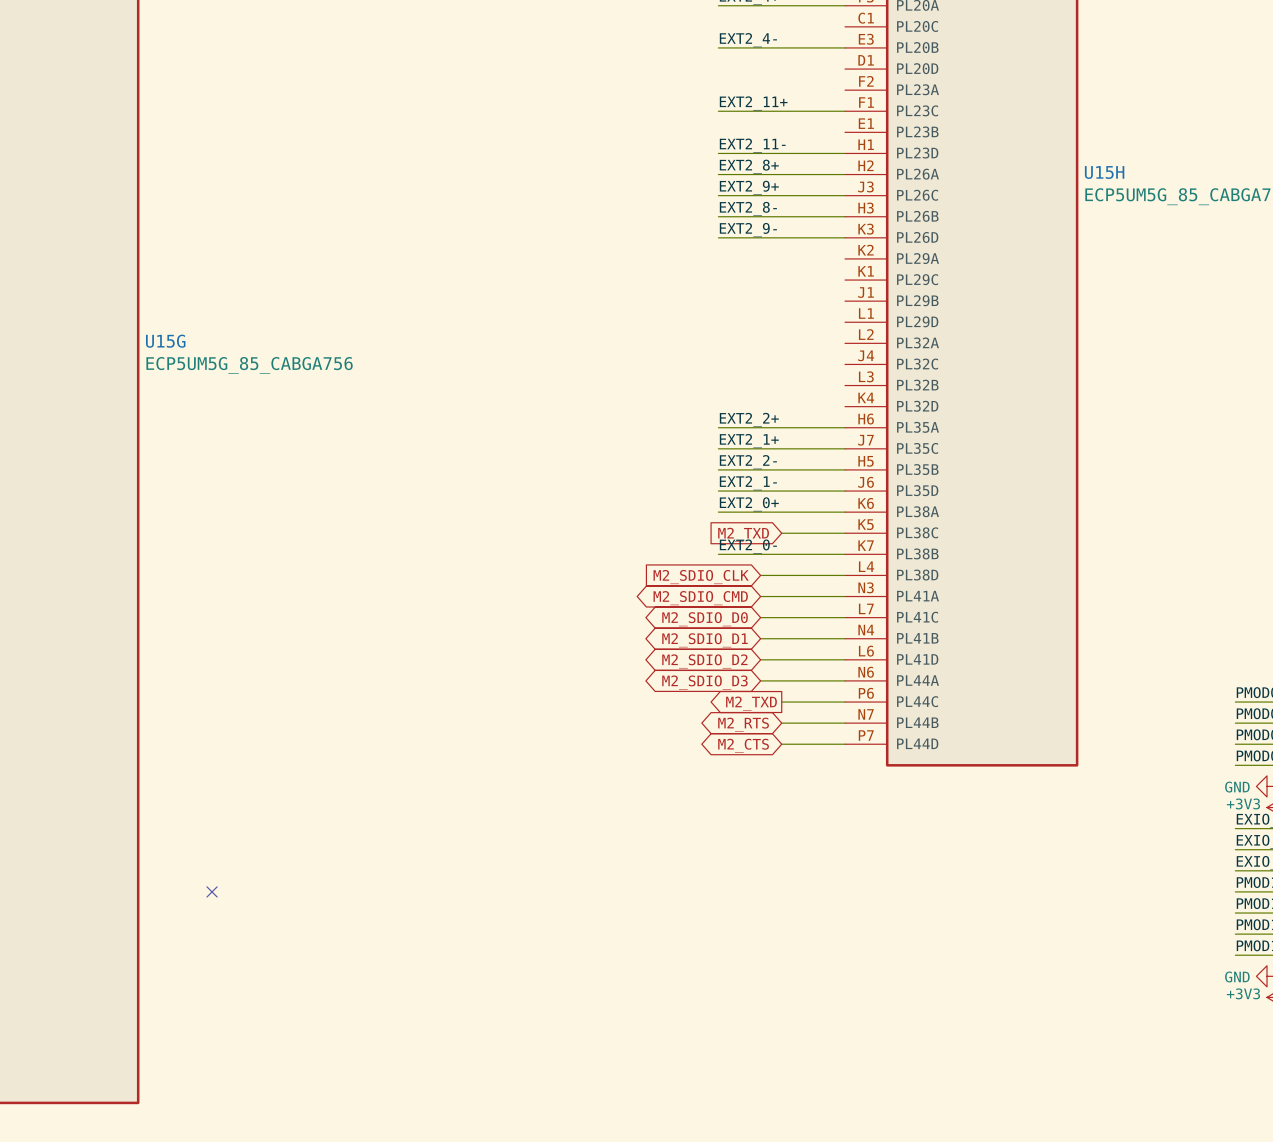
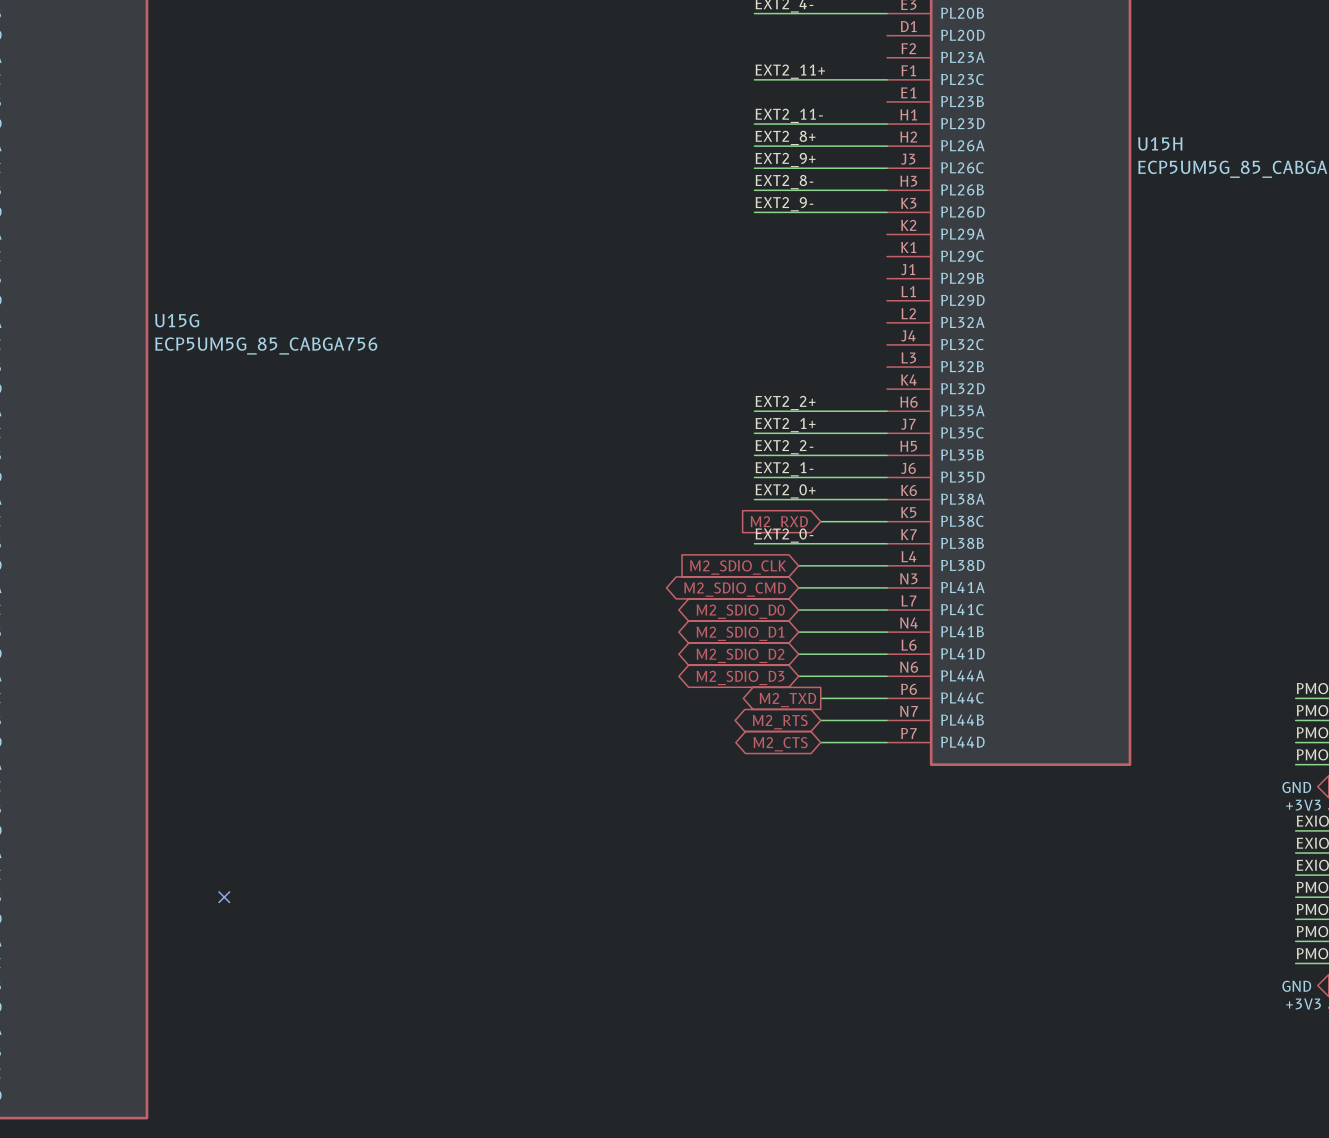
global label: M2_TXD (743, 534) -> M2_RXD (779, 523)

